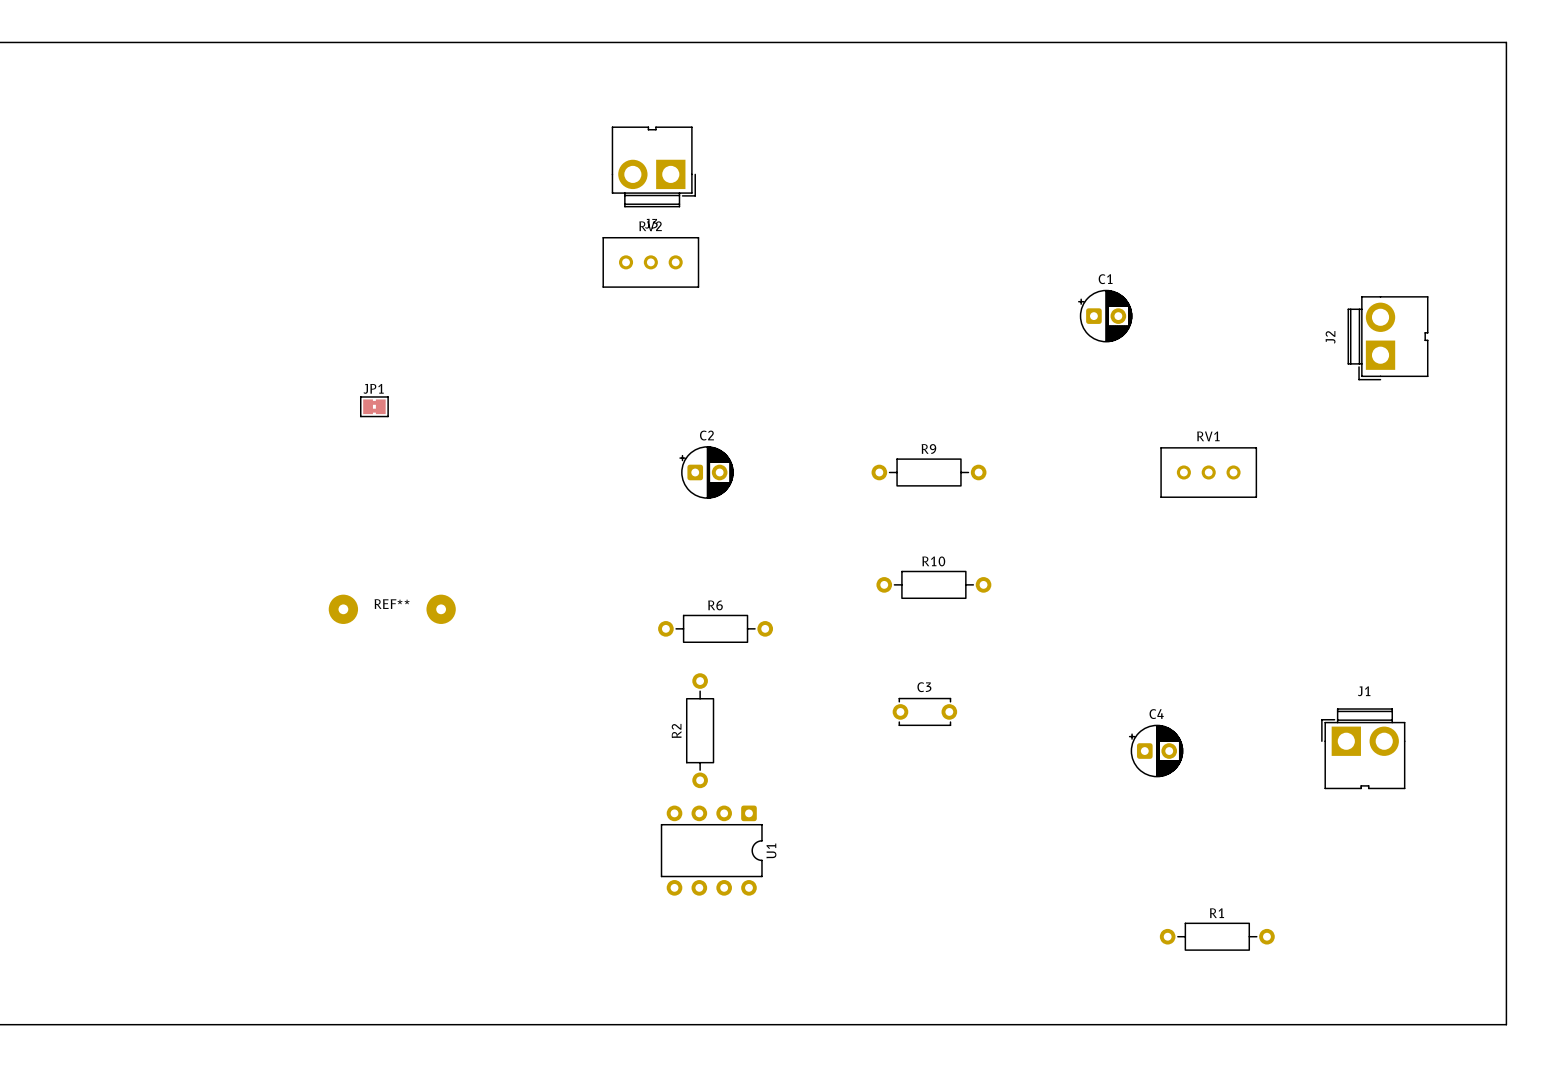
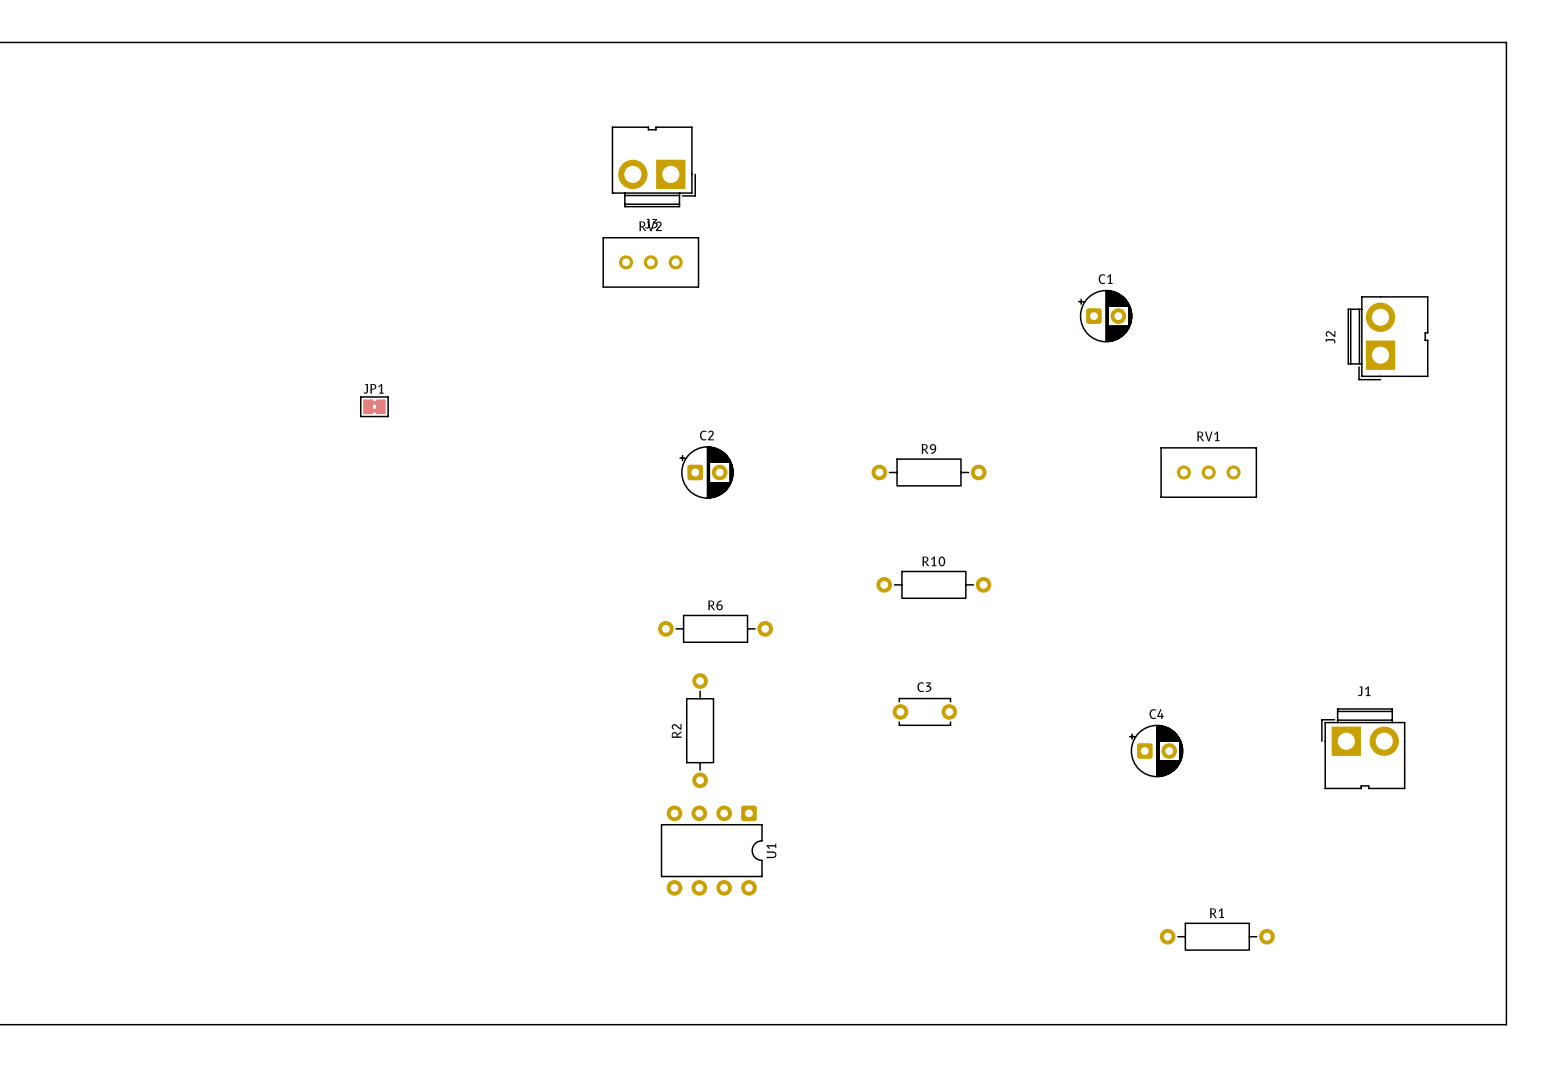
REF**: (392, 609) -> none

